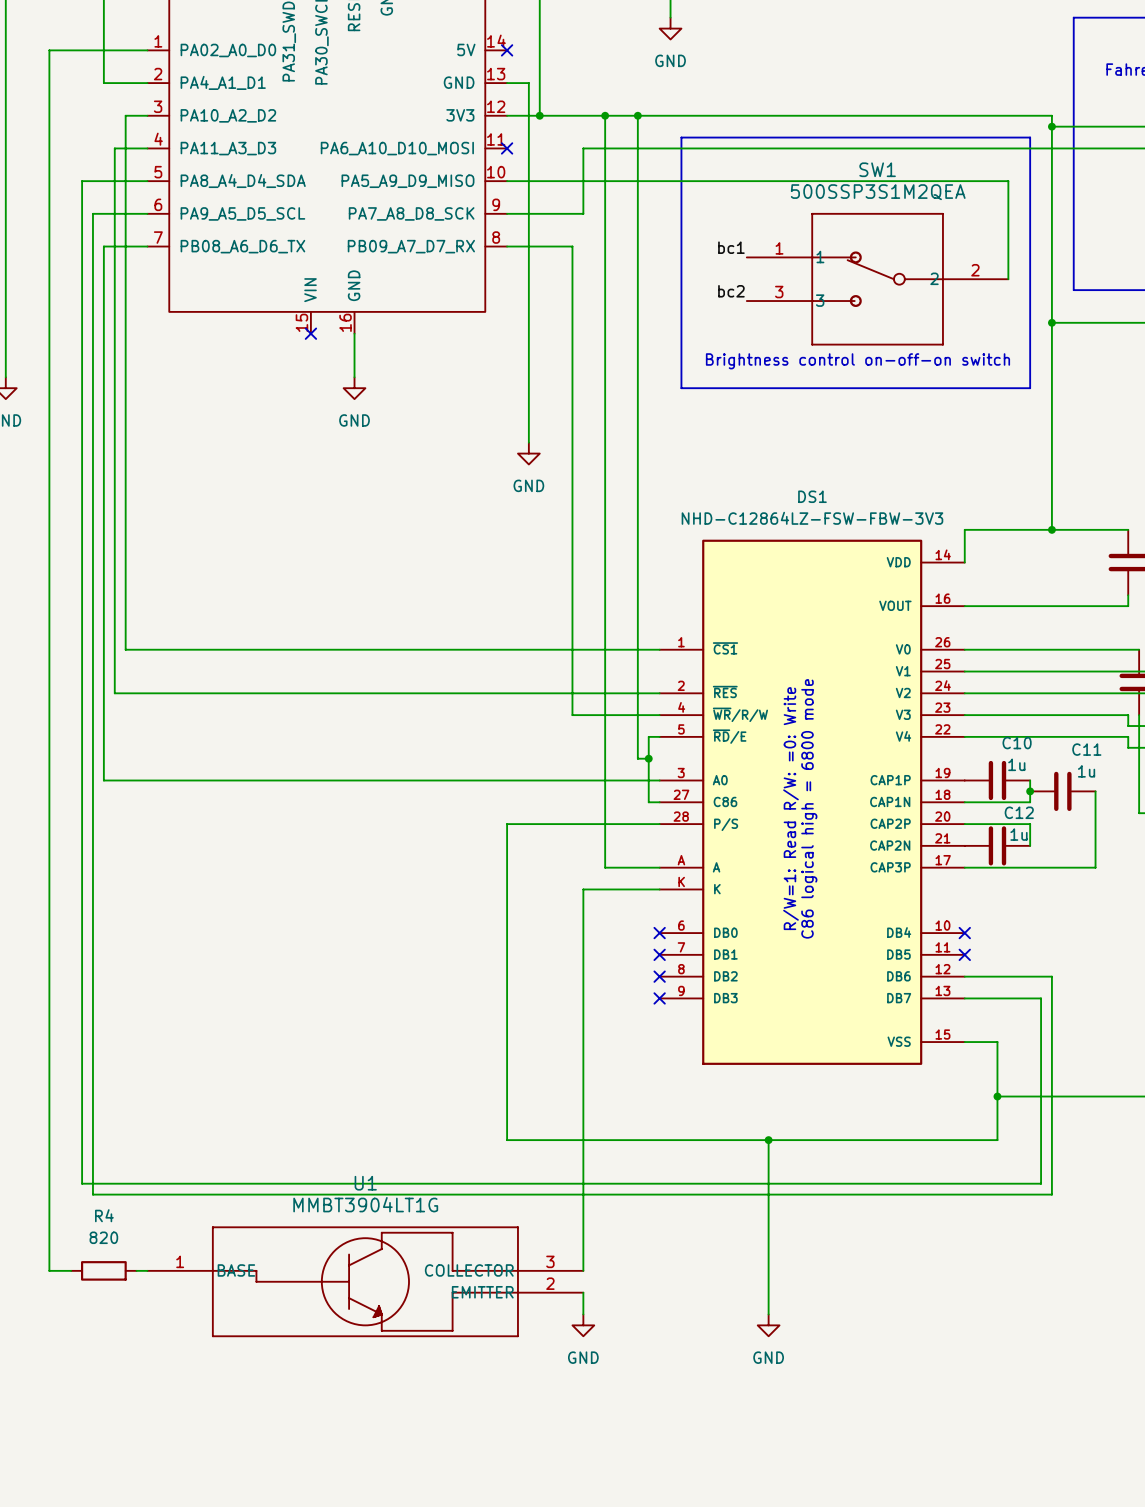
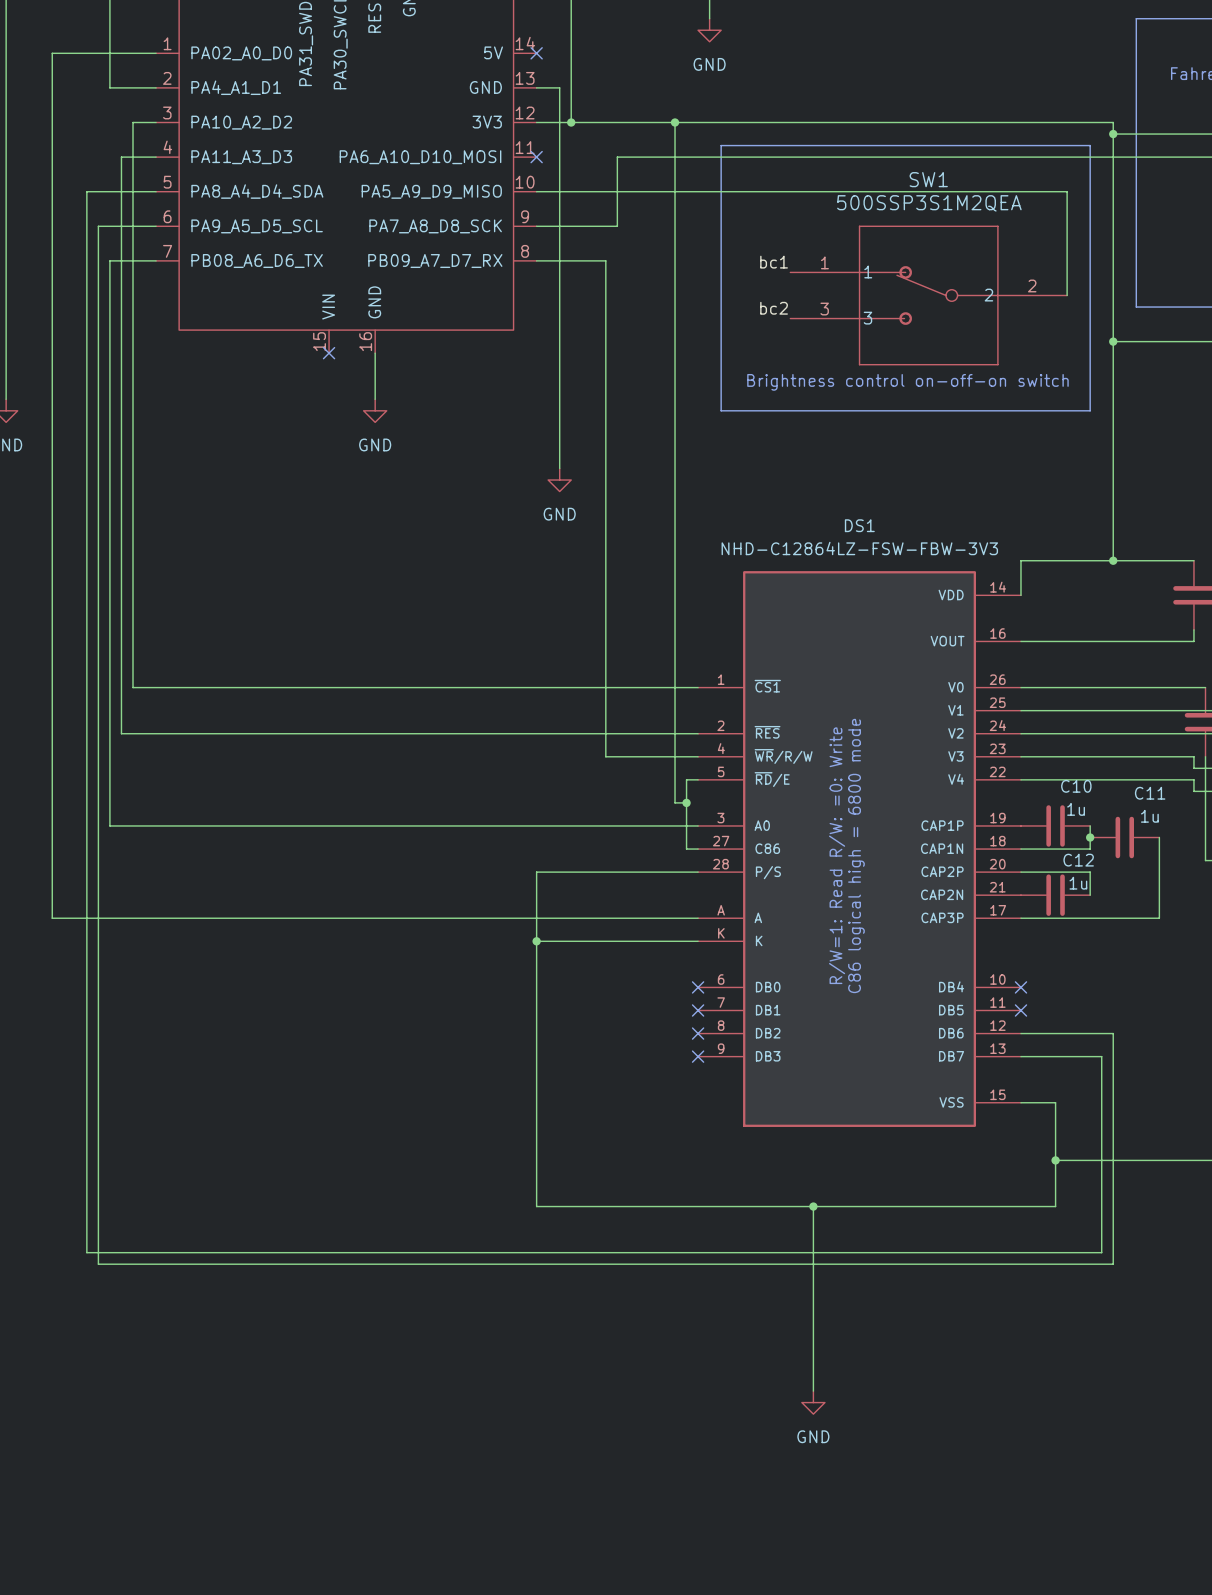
wire: (605, 115) (605, 867) -> none
junction: (605, 115) -> none
wire: (49, 867) (49, 1270) (71, 1270) -> (52, 918) (640, 918)
junction: none -> (536, 941)
wire: (583, 889) (583, 1270) -> (617, 941) (536, 941)
R4: 820 (103, 1270) -> none
wire: (136, 1270) (147, 1270) -> none
U1: MMBT3904LT1G (365, 1281) -> none
wire: (583, 1292) (583, 1314) -> none
power symbol: GND (583, 1325) -> none

